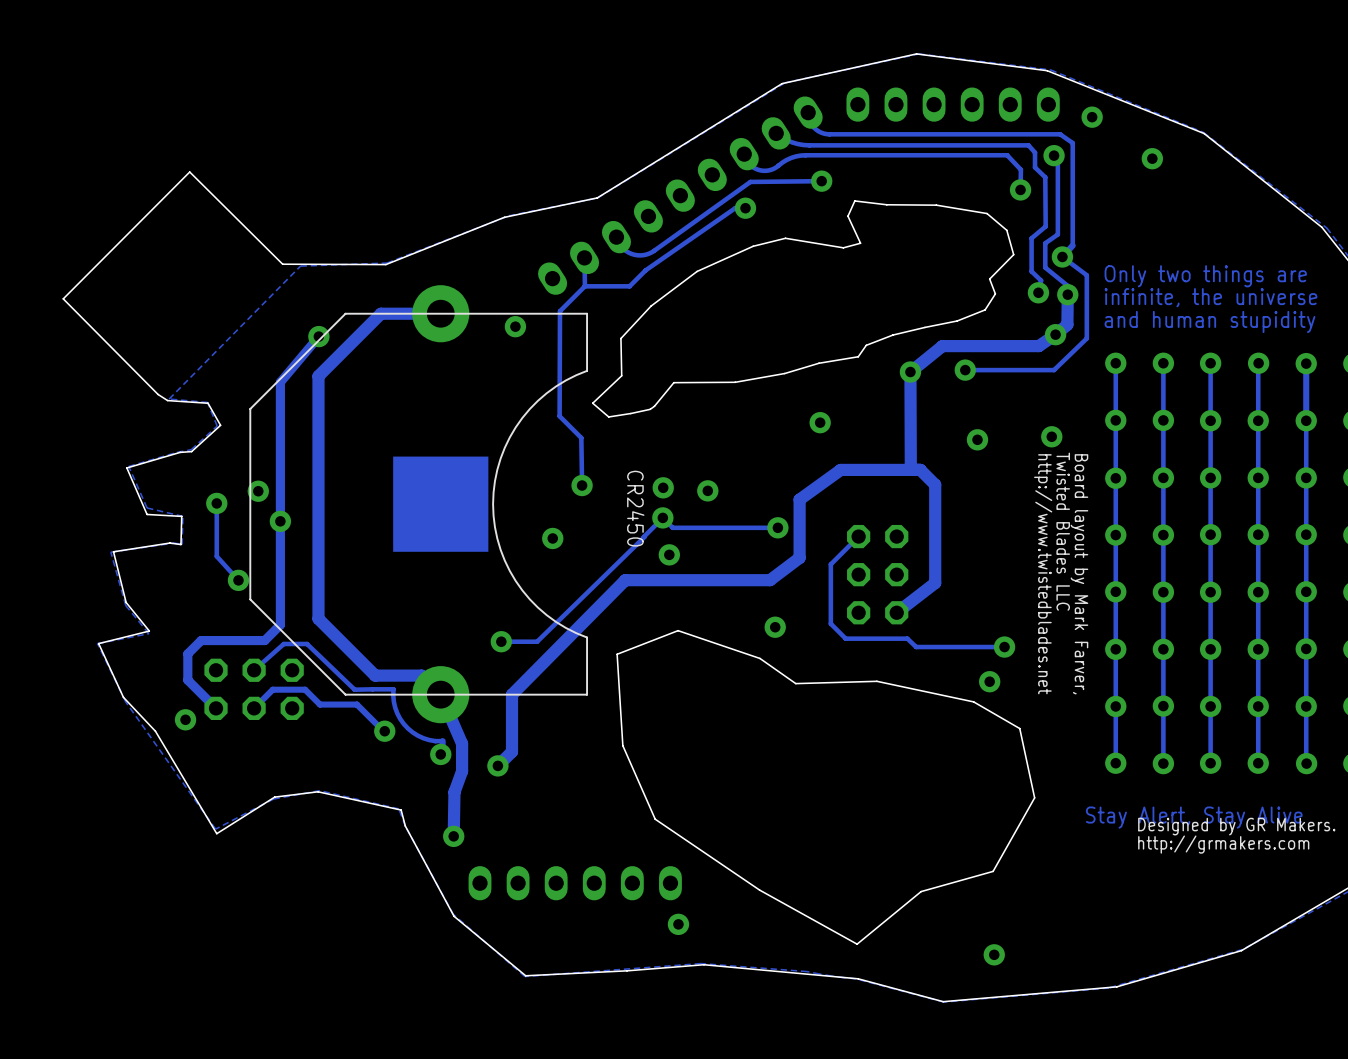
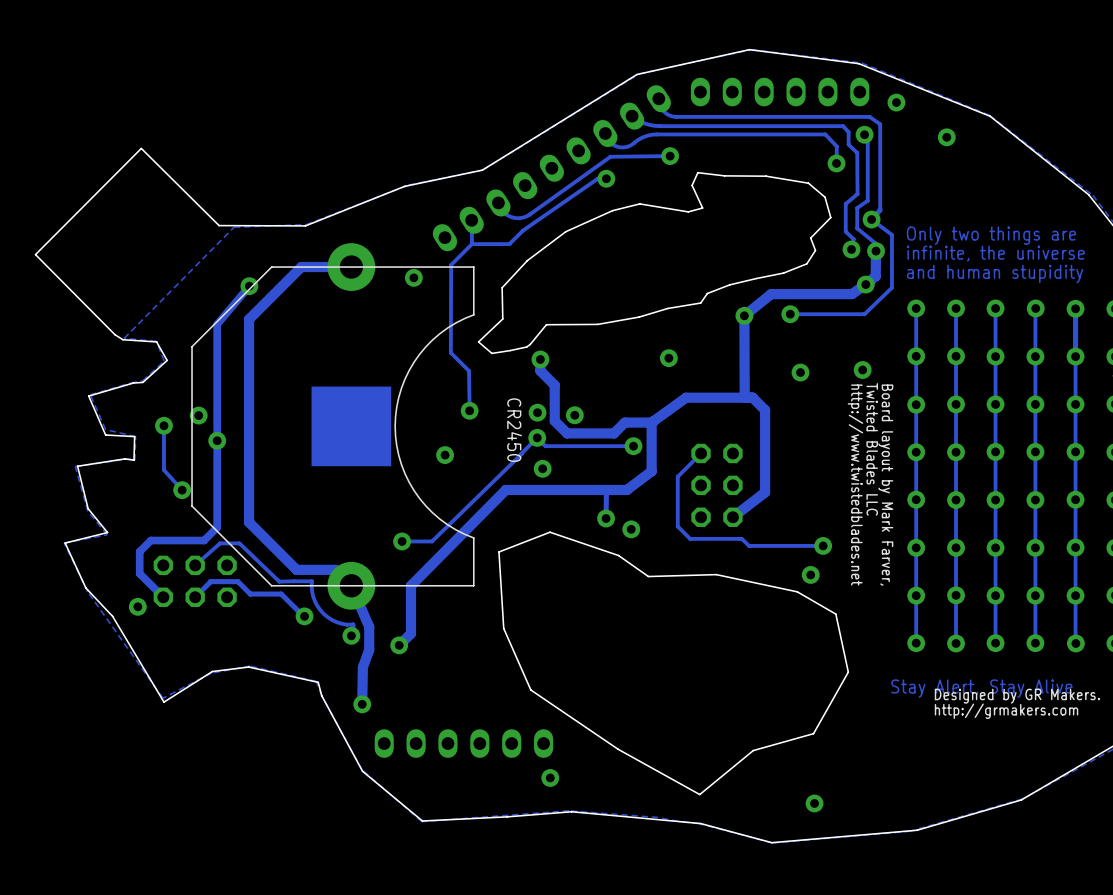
track: none -> (540, 359) (540, 370) (554, 385) (554, 420) (567, 433) (614, 433) (624, 422) (651, 422)
via: none -> (540, 359)
track: none -> (610, 489) (606, 494) (606, 518)
via: none -> (606, 518)

